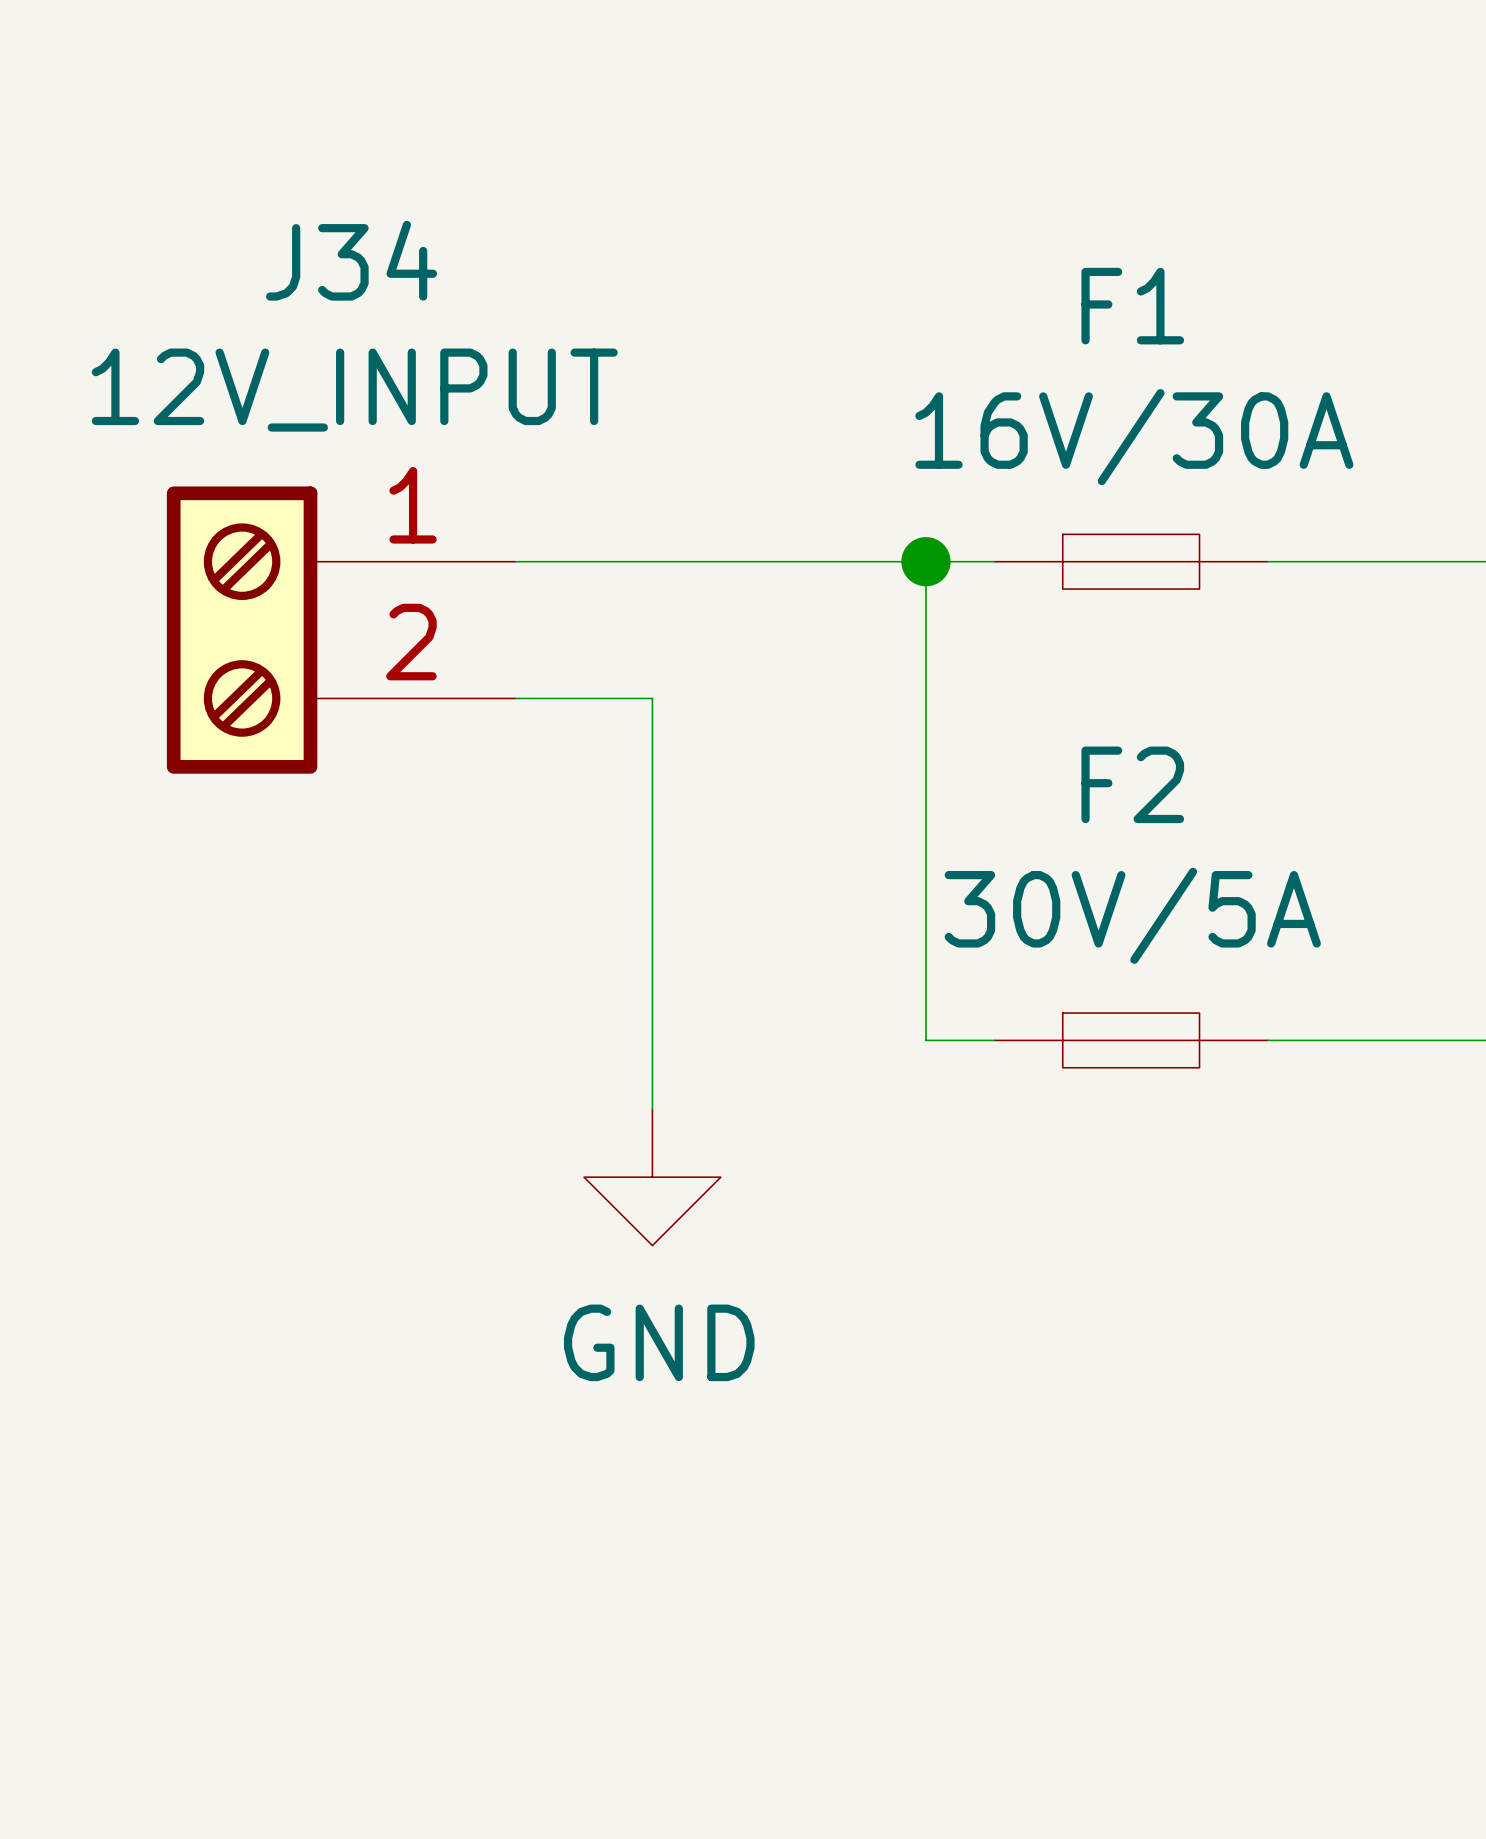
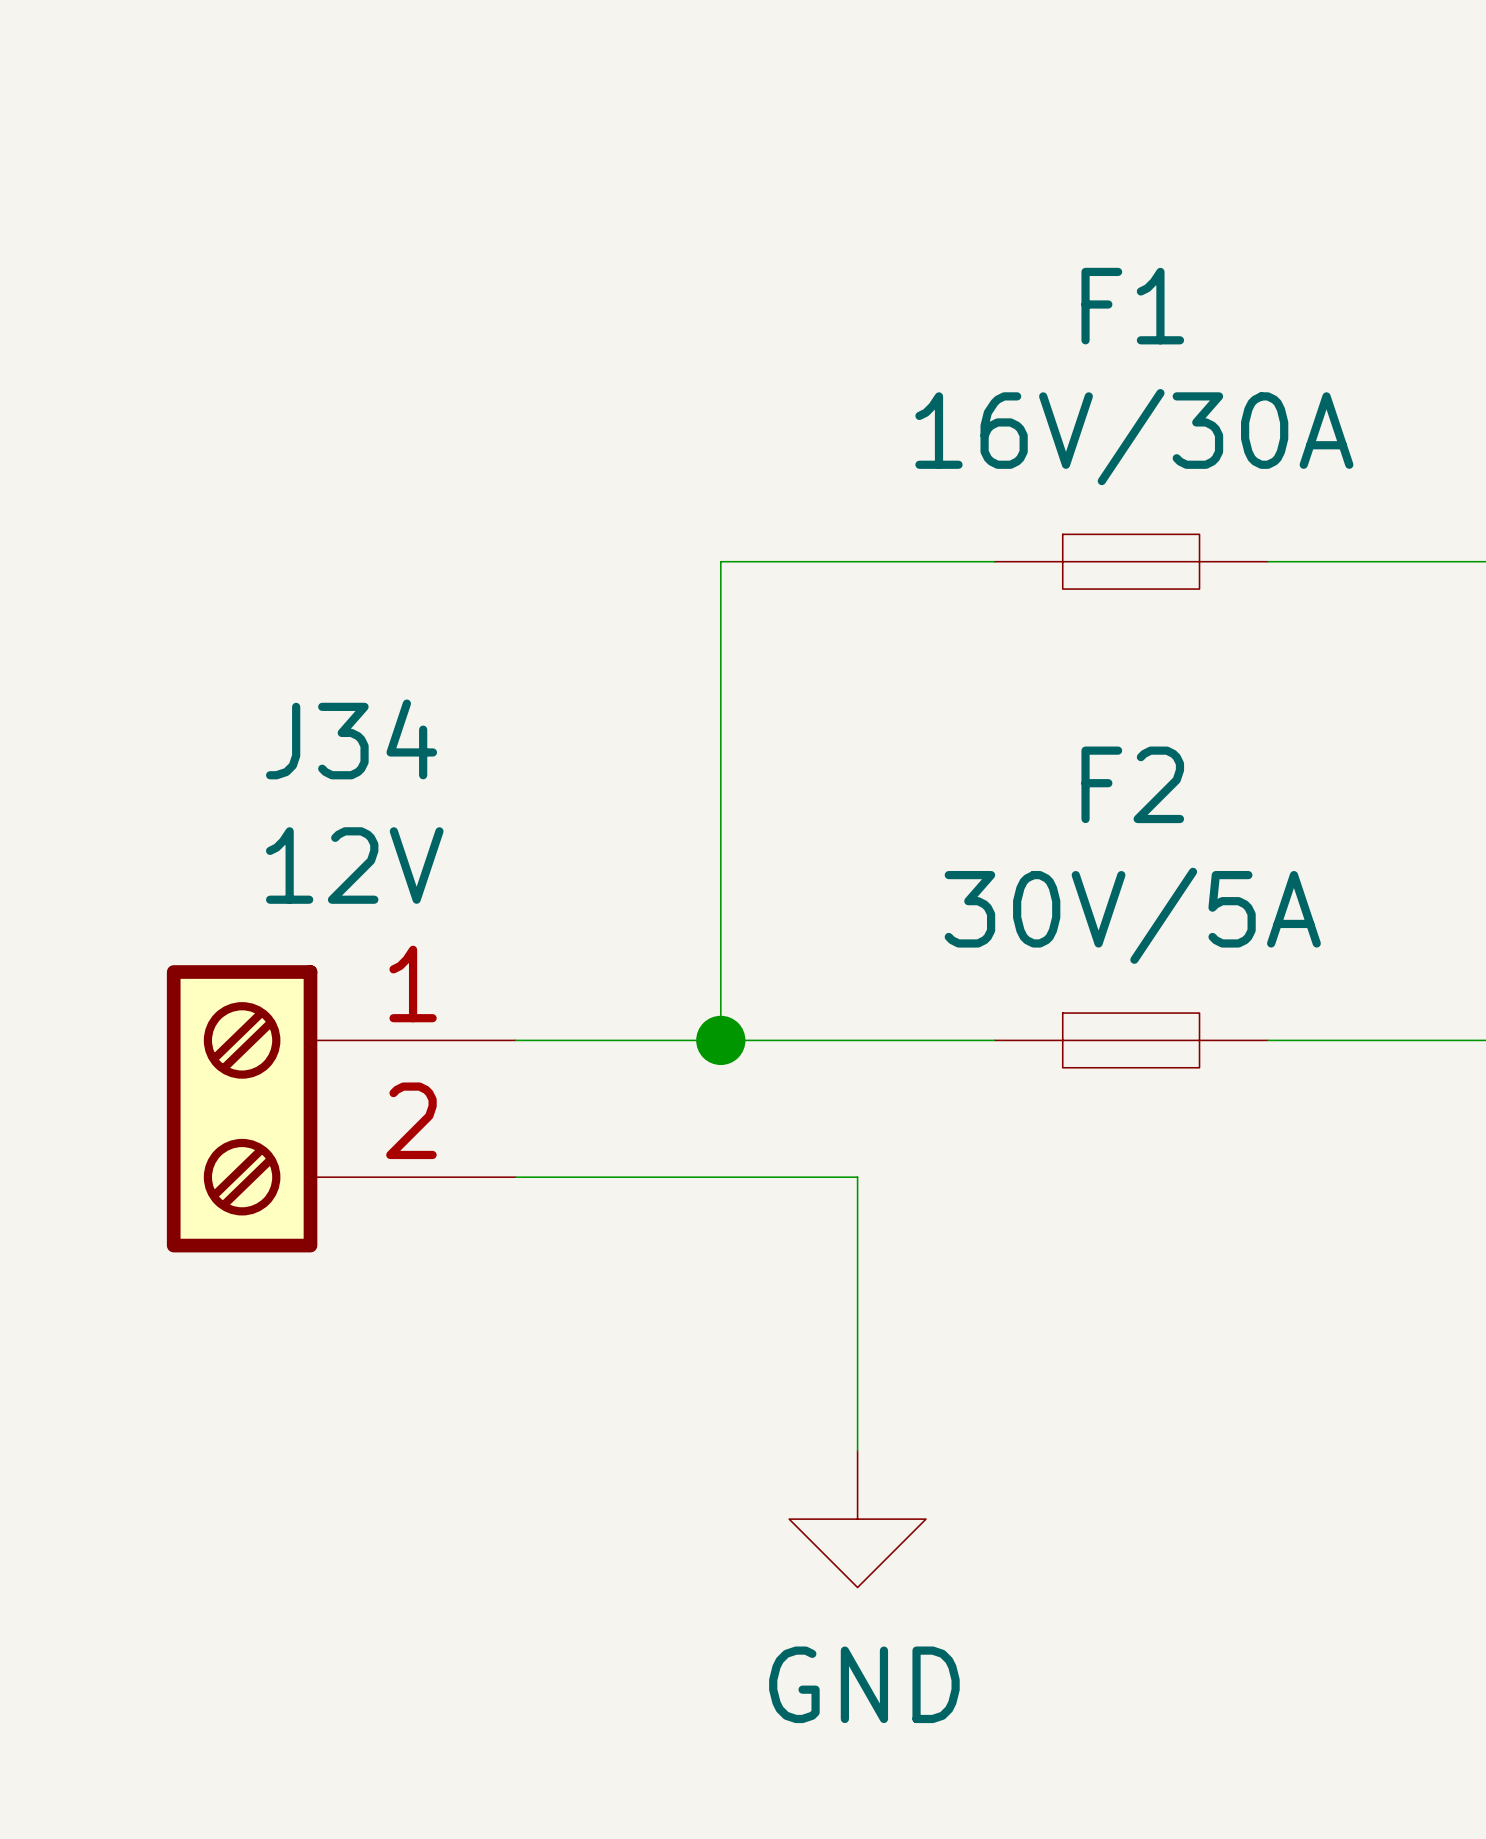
J34 value: 12V_INPUT (354, 390) -> 12V (354, 865)
wire: (515, 561) (720, 561) -> (720, 1040) (720, 561)
wire: (925, 561) (925, 1040) -> (515, 1040) (925, 1040)
junction: (925, 561) -> none
J34 position: (341, 630) -> (341, 1108)
wire: (515, 698) (652, 698) (652, 1108) -> none
junction: none -> (720, 1040)
wire: none -> (515, 1177) (857, 1177) (857, 1450)
power symbol position: GND (652, 1177) -> GND (857, 1519)

